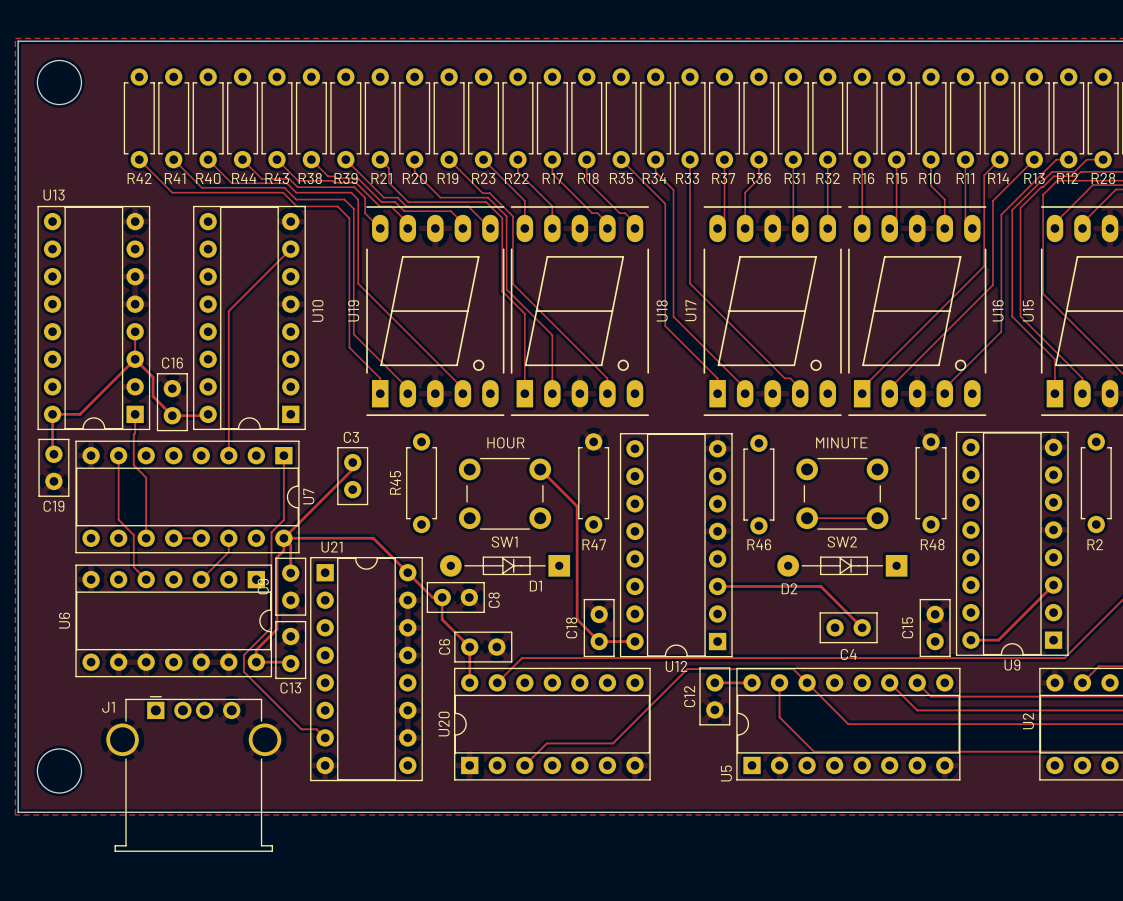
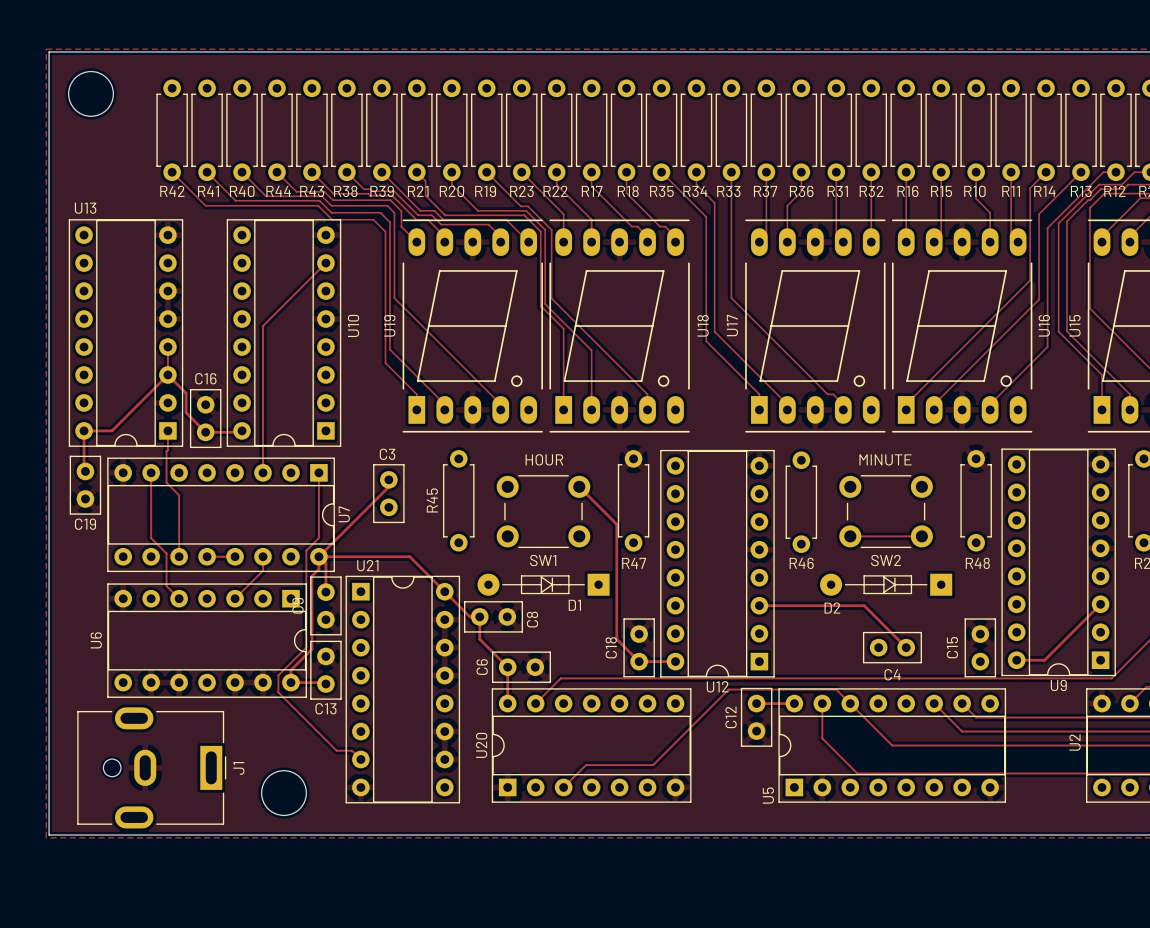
J1 footprint: [106, 696, 282, 852] -> [77, 707, 227, 829]
J1 name position: J1 (108, 707) -> J1 (238, 768)
round board edge position: (59, 770) -> (283, 793)

